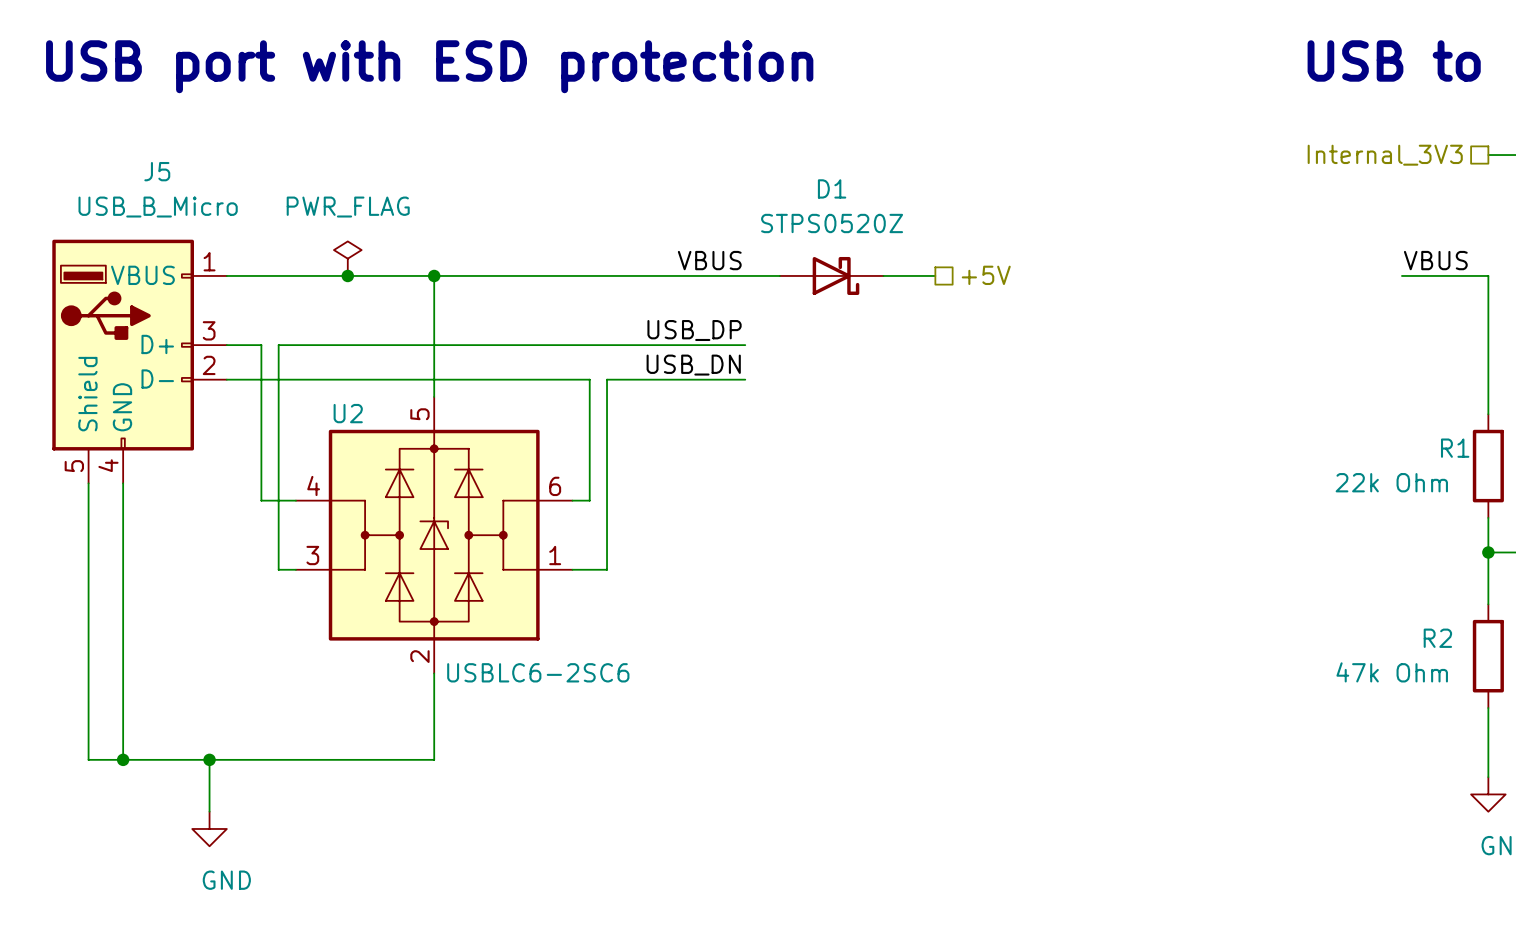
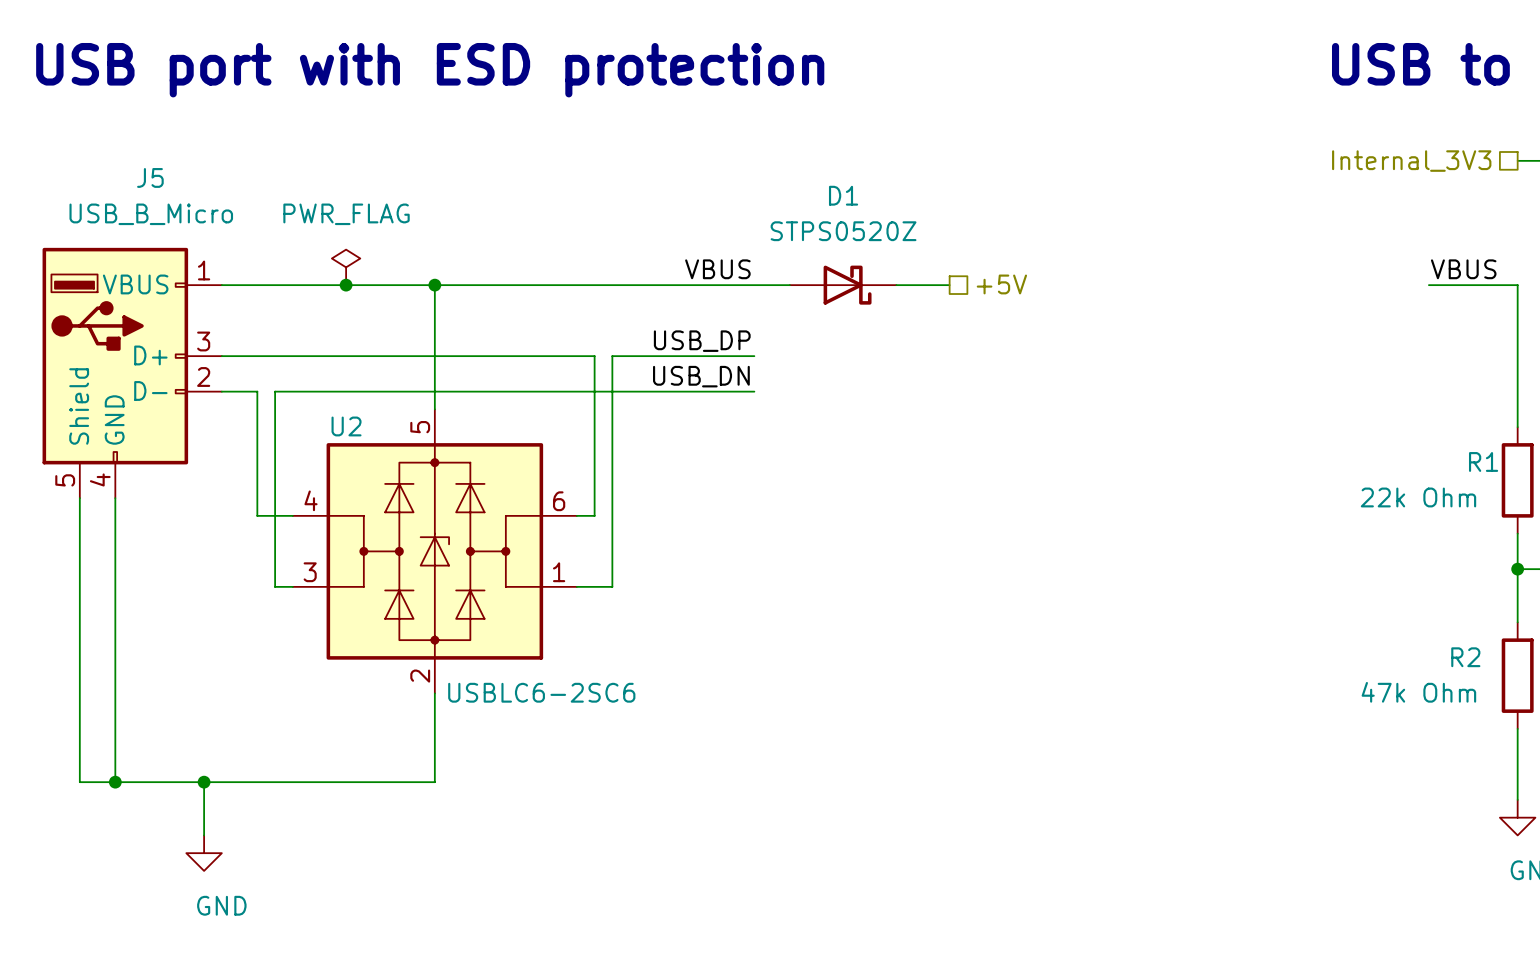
wire: (261, 345) (261, 379) (278, 379) (278, 345) -> (257, 356) (275, 356)
wire: (589, 345) (607, 345) -> (594, 356) (594, 391) (612, 391) (612, 356)

